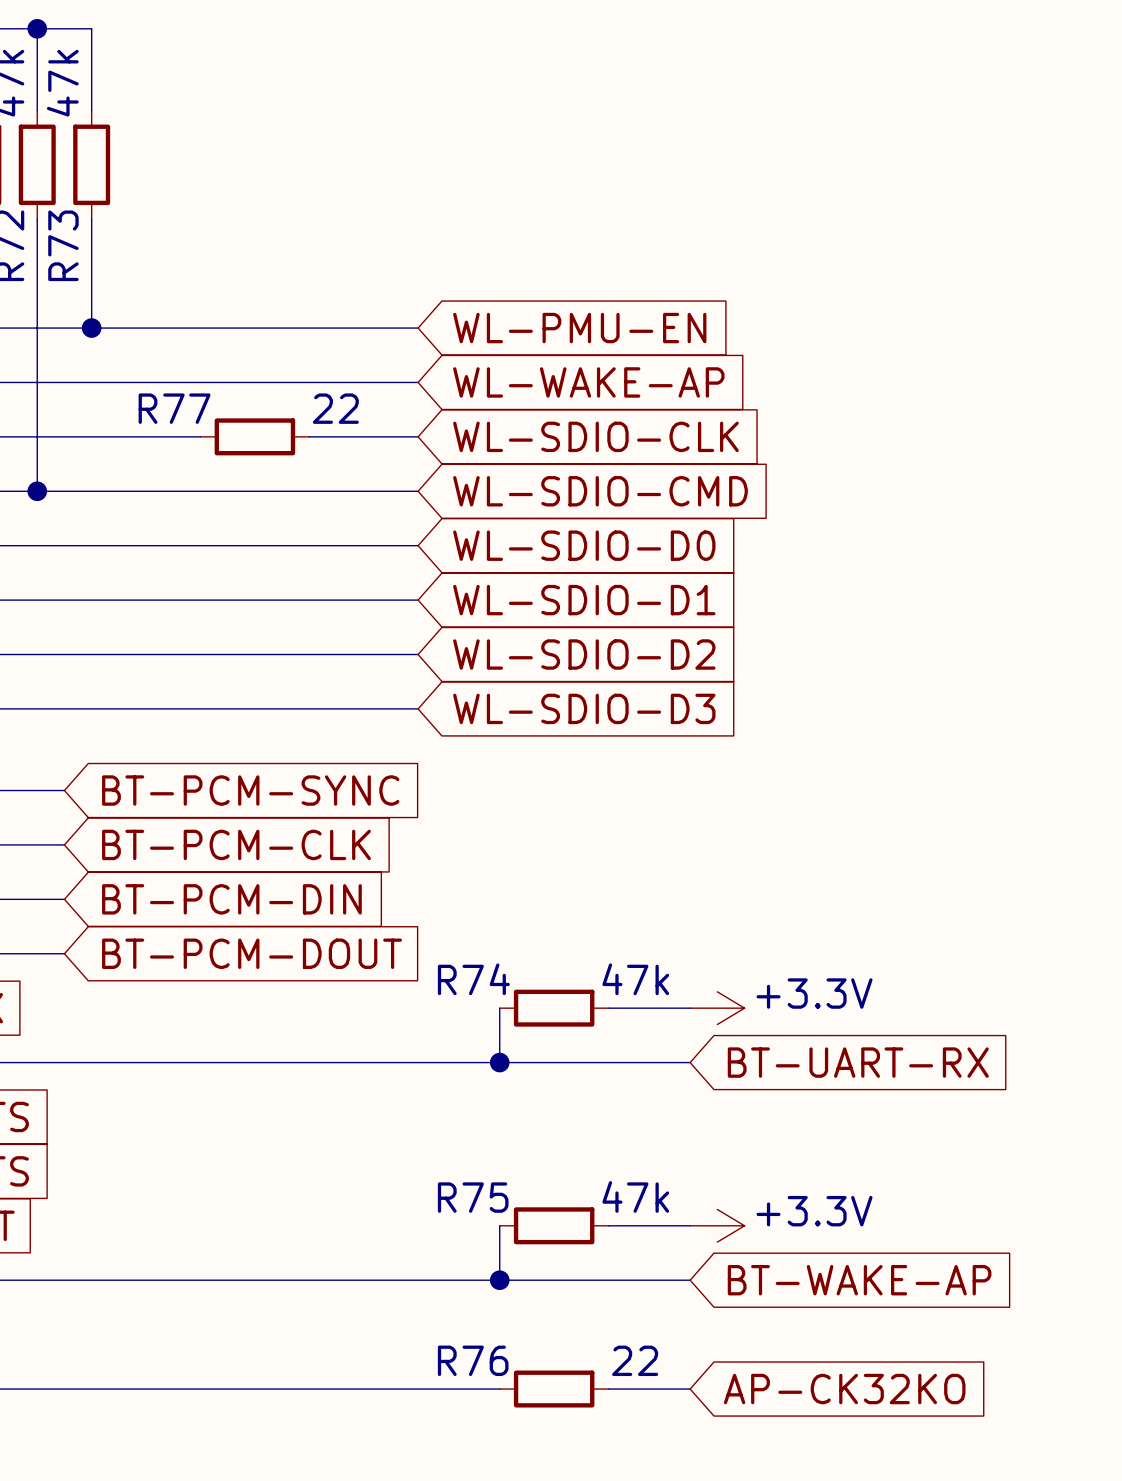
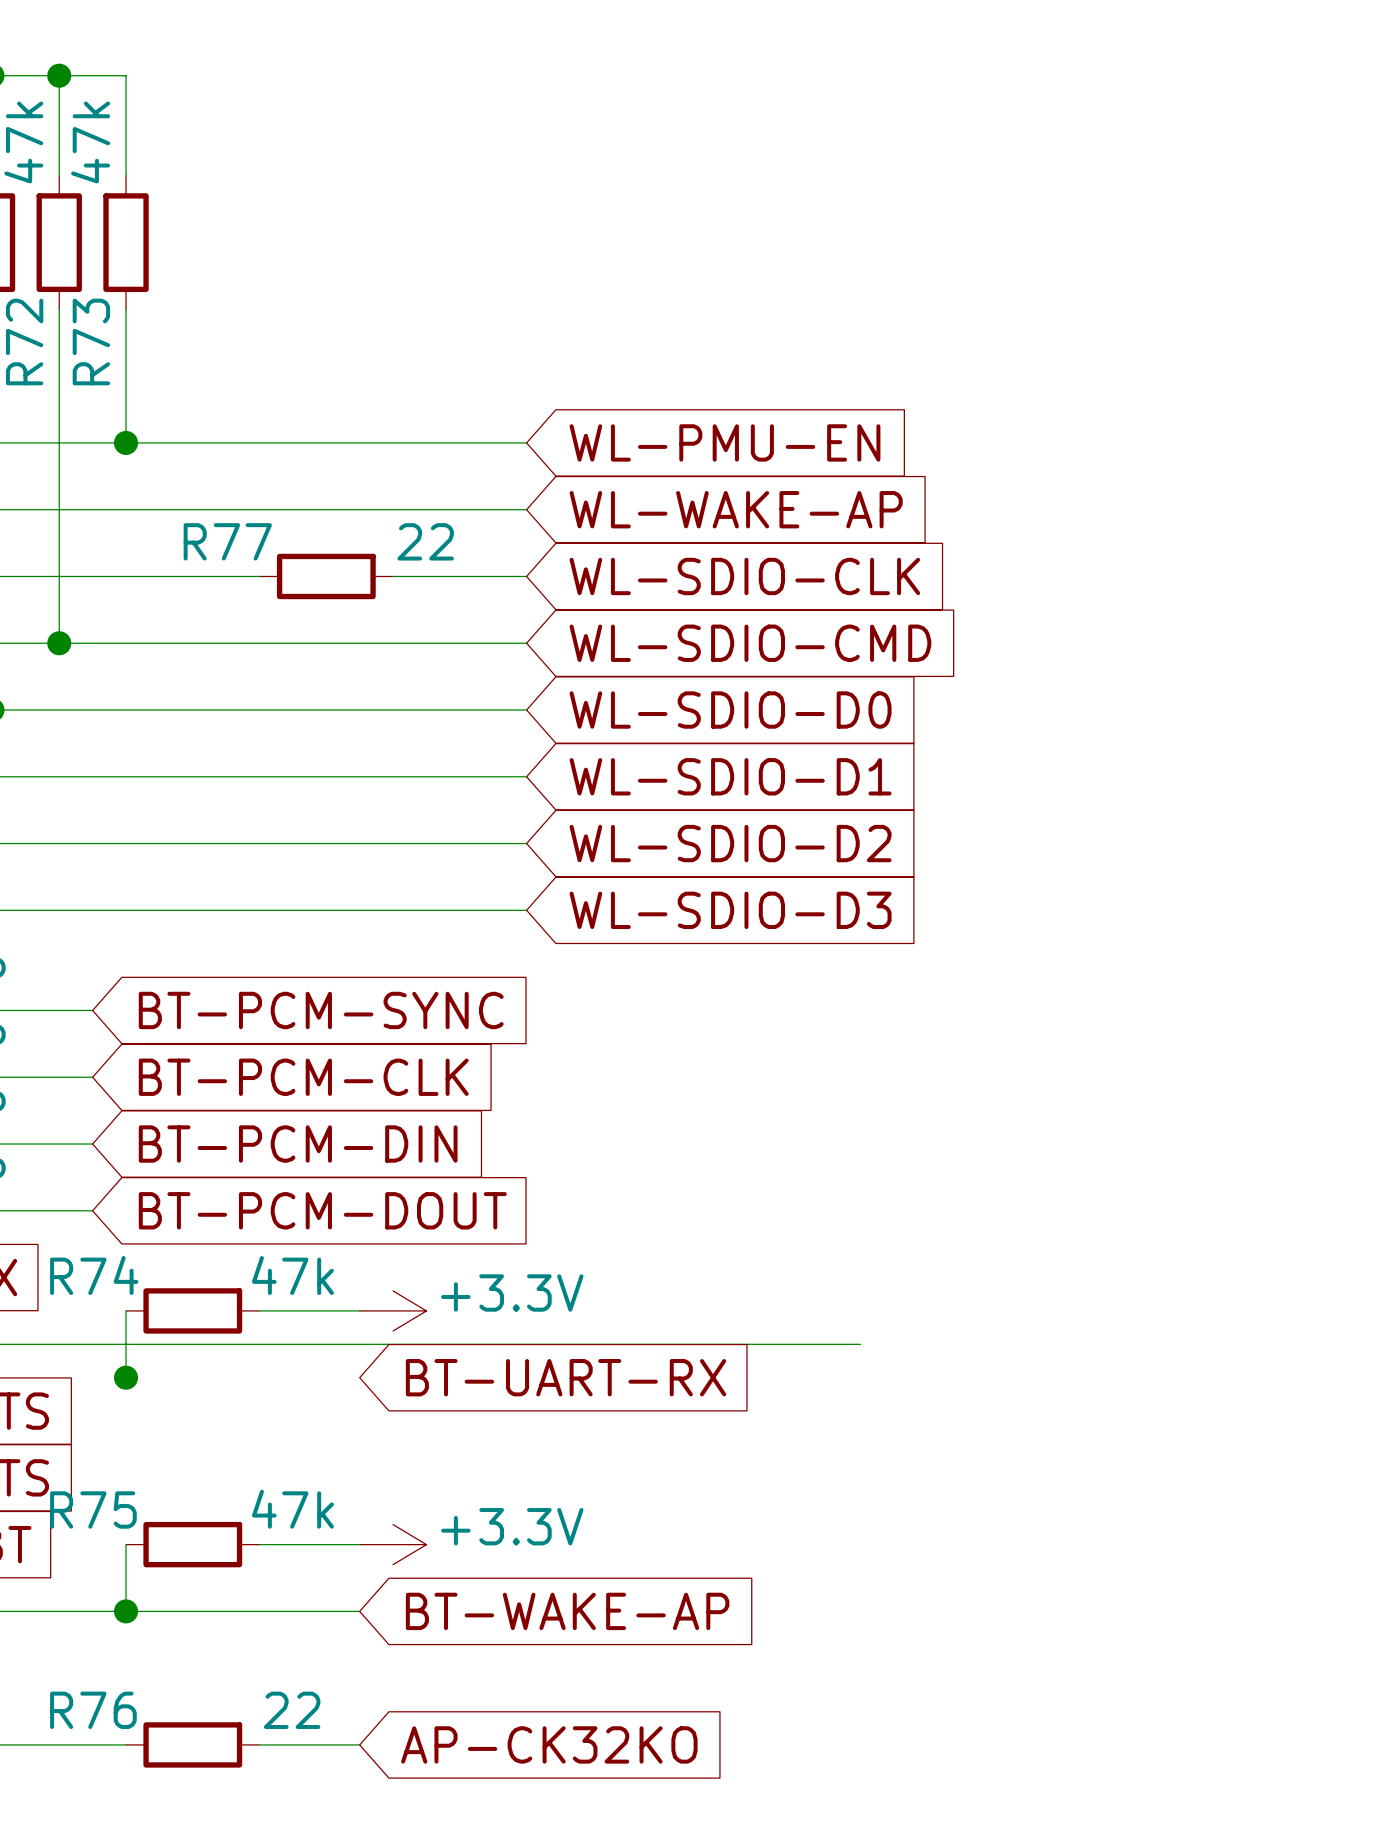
wire: (499, 1008) (499, 1062) -> (126, 1310) (126, 1377)
R74 position: (554, 1008) -> (192, 1310)
wire: (608, 1008) (690, 1008) -> (259, 1310) (359, 1310)
power symbol: +3.3V (717, 1008) -> none
power symbol: none -> +3.3V (393, 1310)
junction: (499, 1062) -> none
global label position: BT-UART-RX (858, 1062) -> BT-UART-RX (566, 1377)
junction: none -> (126, 1377)
power symbol: none -> +3.3V (393, 1544)
wire: (499, 1225) (499, 1280) -> (126, 1544) (126, 1611)
R75 position: (554, 1225) -> (192, 1544)
wire: (608, 1225) (690, 1225) -> (259, 1544) (359, 1544)
power symbol: +3.3V (717, 1225) -> none
junction: none -> (126, 1611)
wire: (282, 1280) (690, 1280) -> none
junction: (499, 1280) -> none
global label position: BT-WAKE-AP (859, 1280) -> BT-WAKE-AP (567, 1611)
wire: (91, 1389) (200, 1389) -> none
wire: (282, 1389) (499, 1389) -> none
R76 position: (554, 1389) -> (192, 1744)
wire: (608, 1389) (690, 1389) -> none
global label position: AP-CK32KO (844, 1389) -> AP-CK32KO (549, 1744)

